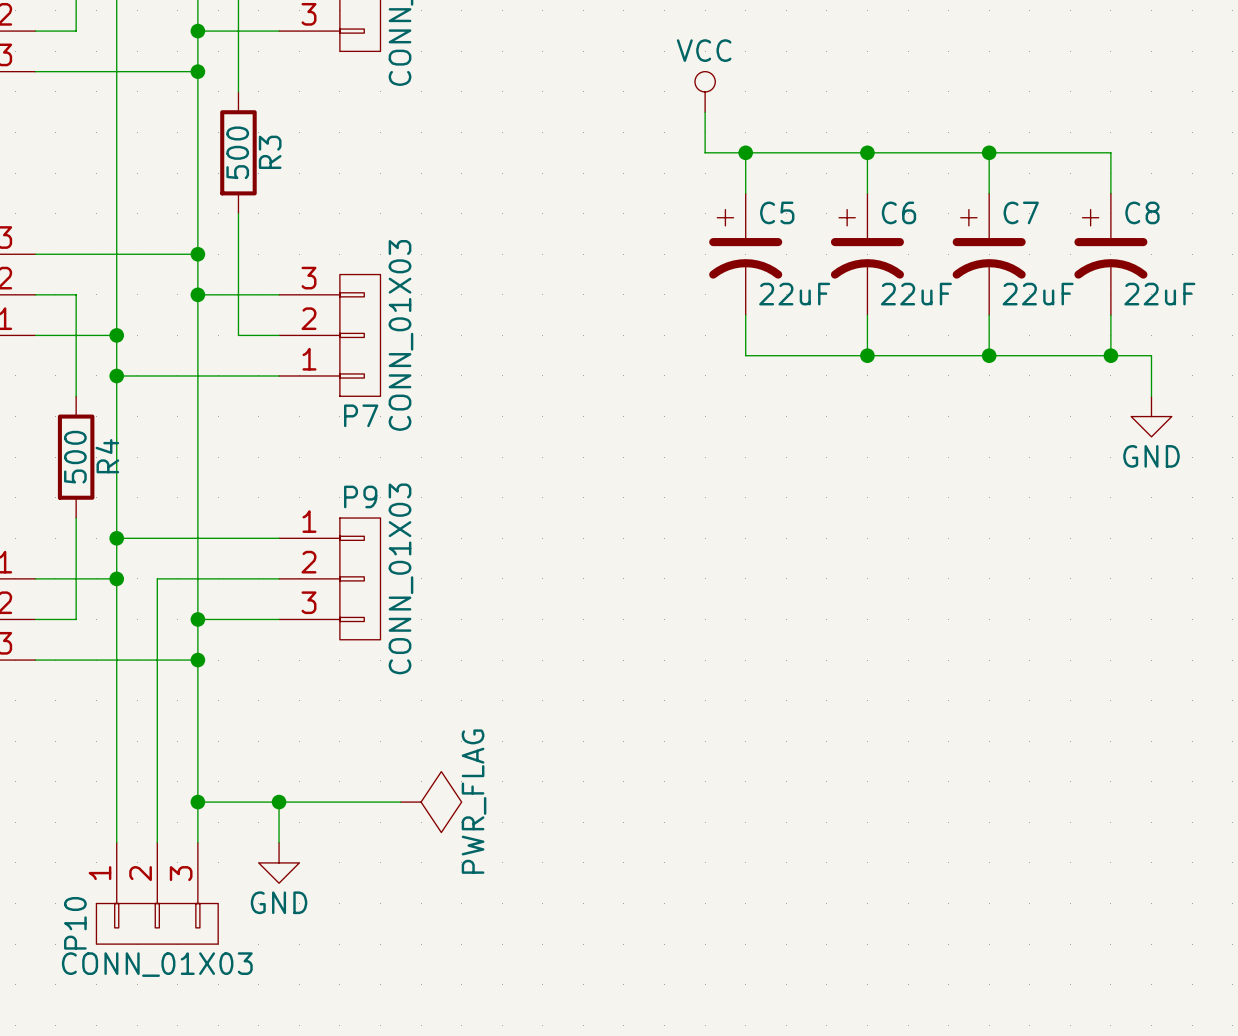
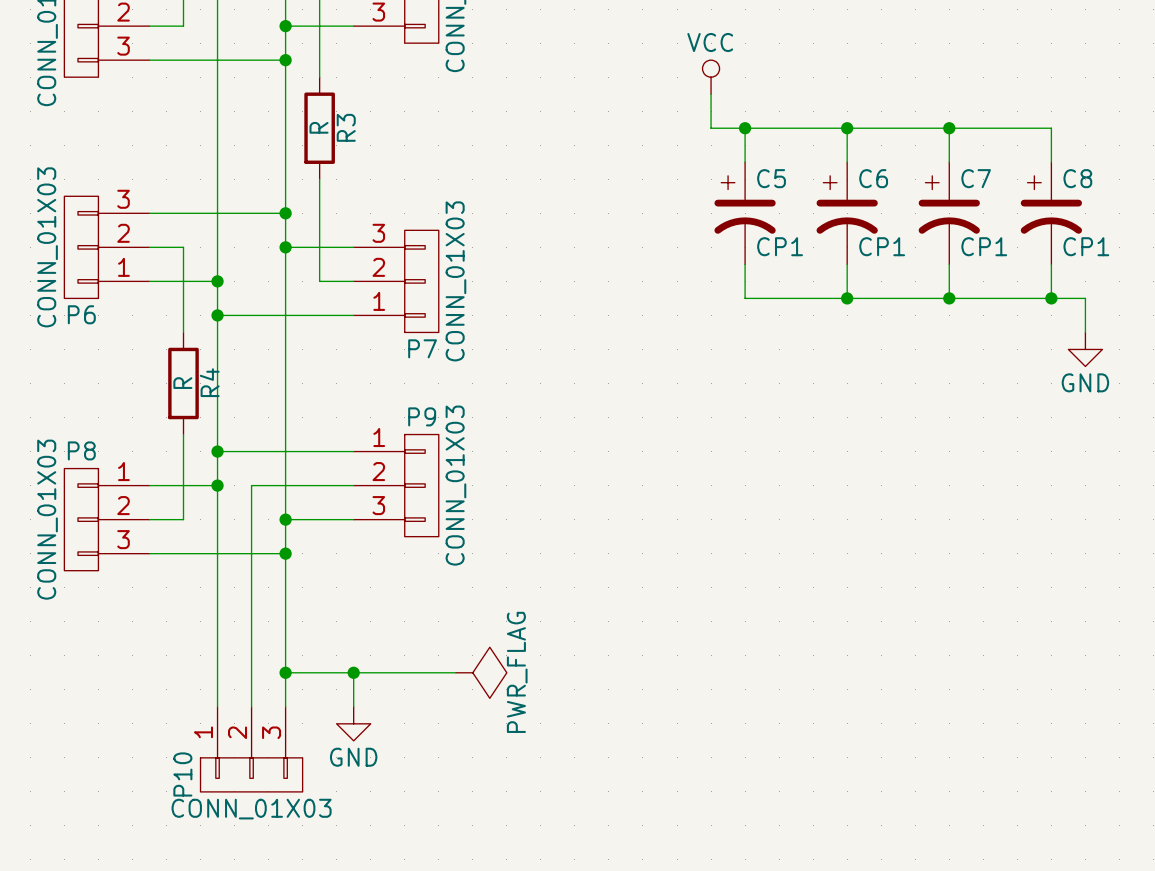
R3 value: 500 (237, 152) -> R (319, 127)
C5 value: 22uF (794, 294) -> CP1 (780, 246)
C6 value: 22uF (916, 294) -> CP1 (882, 246)
C7 value: 22uF (1038, 294) -> CP1 (984, 246)
C8 value: 22uF (1159, 294) -> CP1 (1086, 246)
R4 value: 500 (75, 457) -> R (182, 383)

